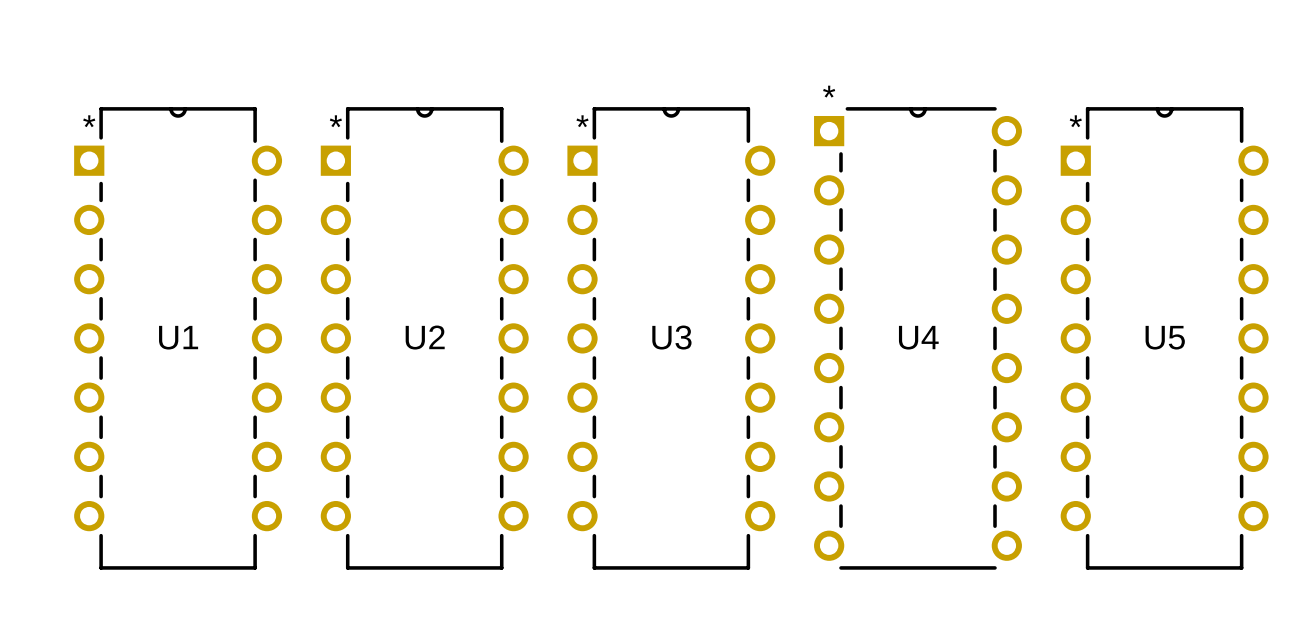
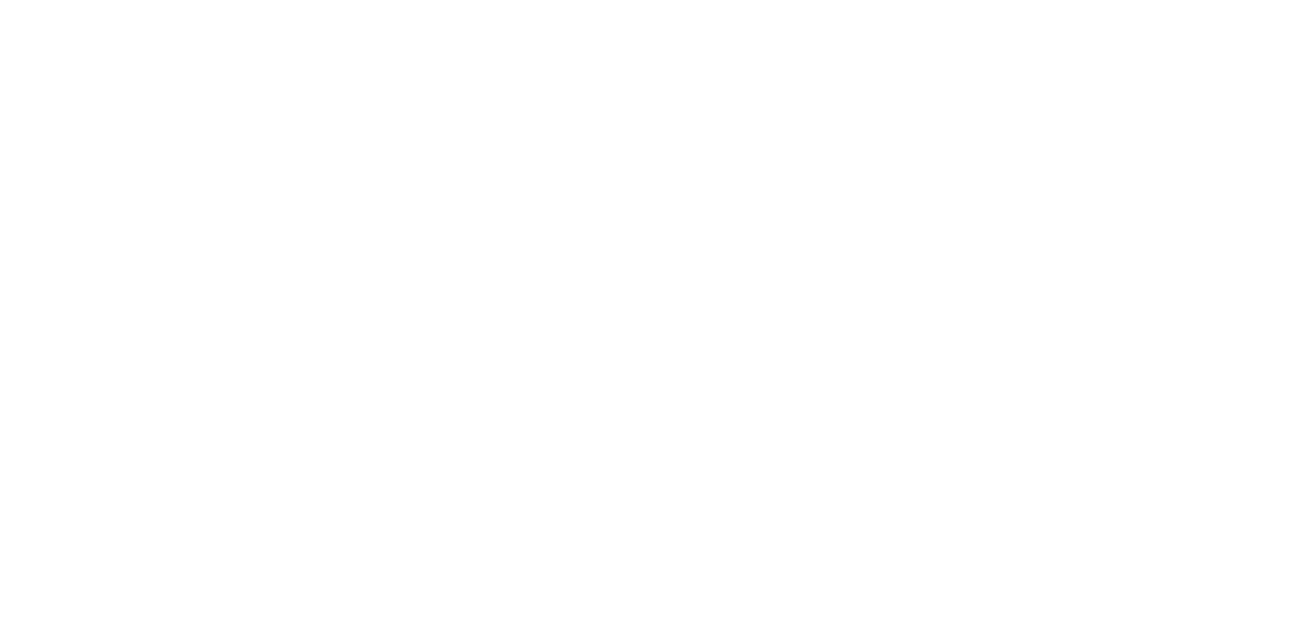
U1: (178, 338) -> none
U2: (424, 338) -> none
U3: (671, 338) -> none
U4: (917, 338) -> none
U5: (1164, 338) -> none

